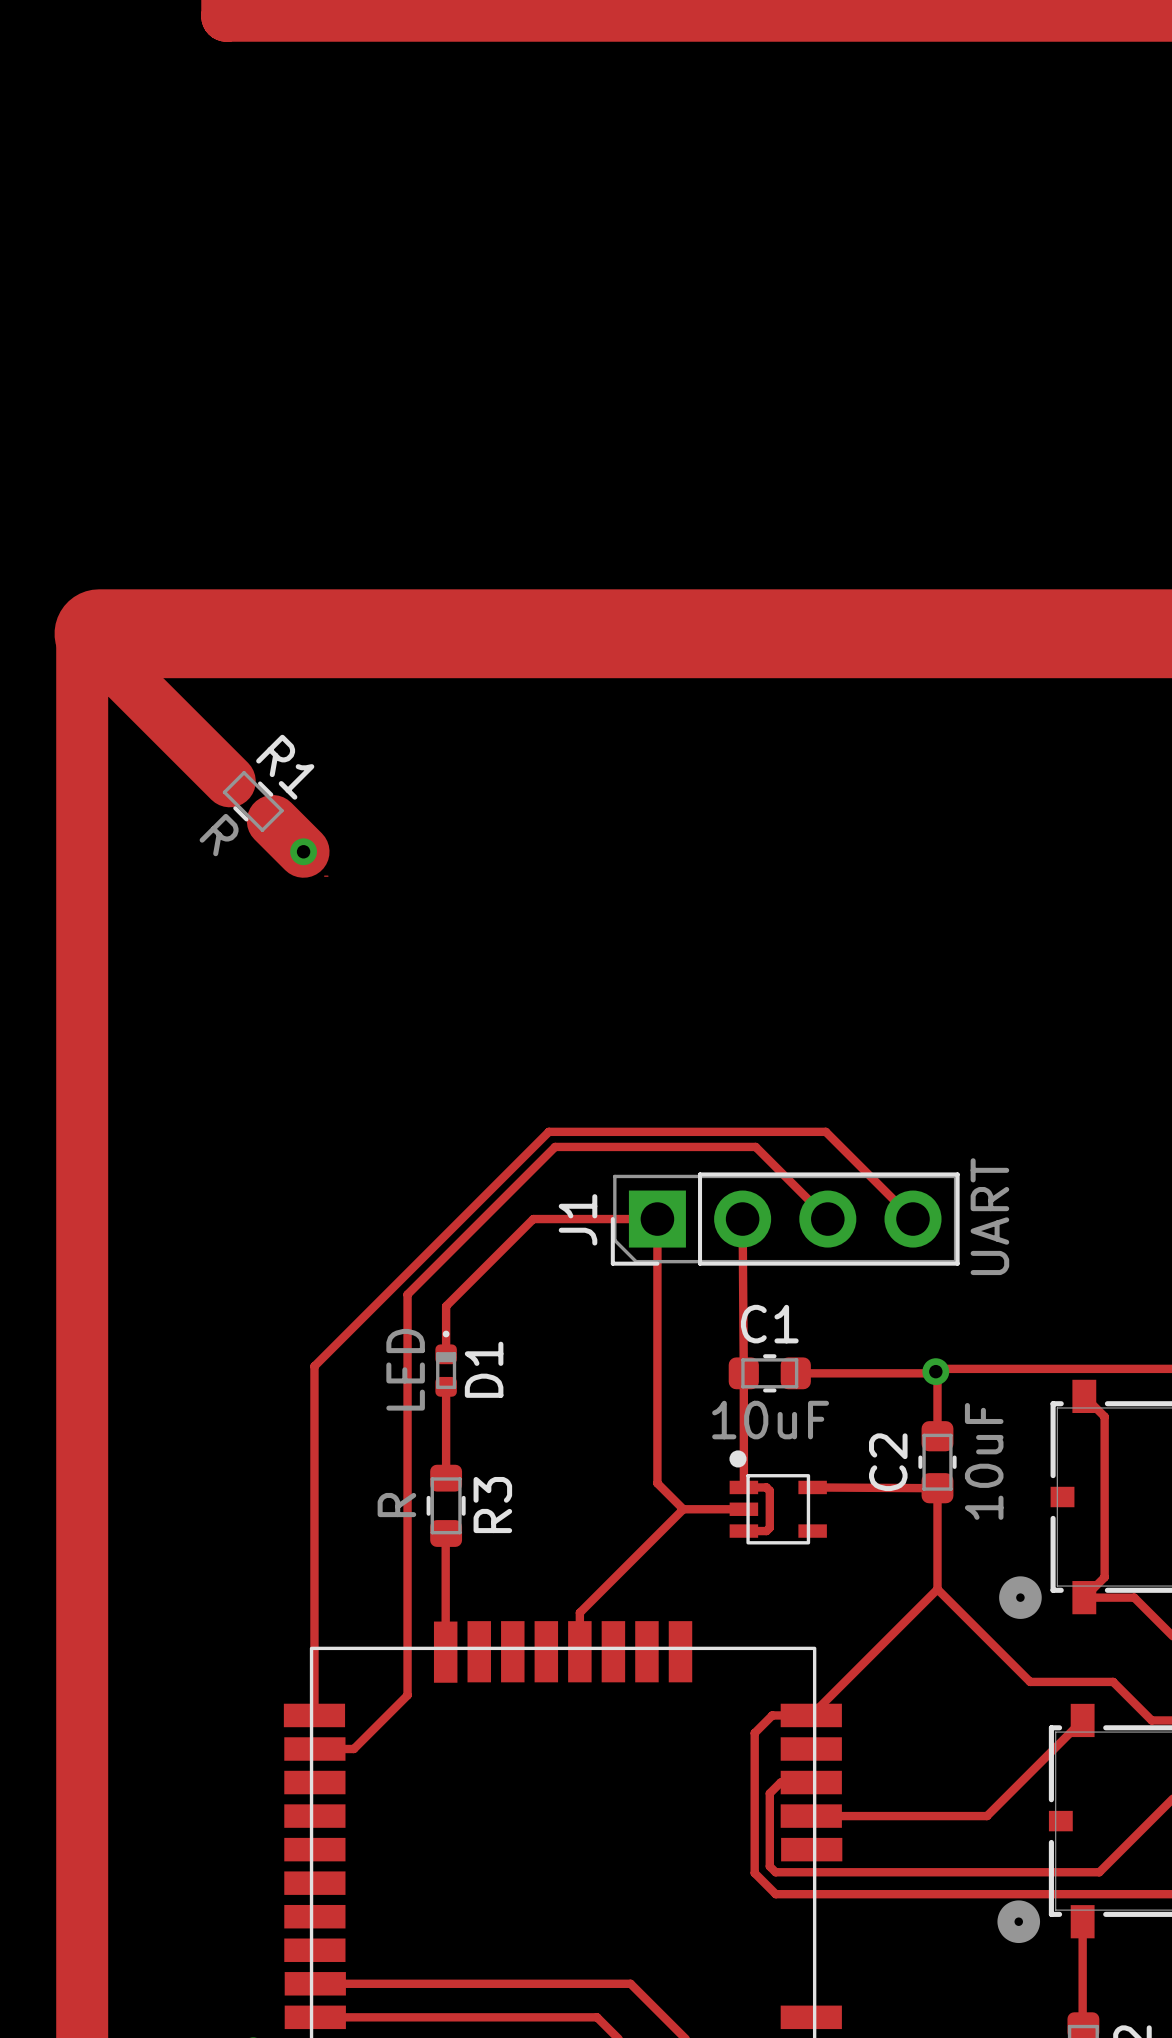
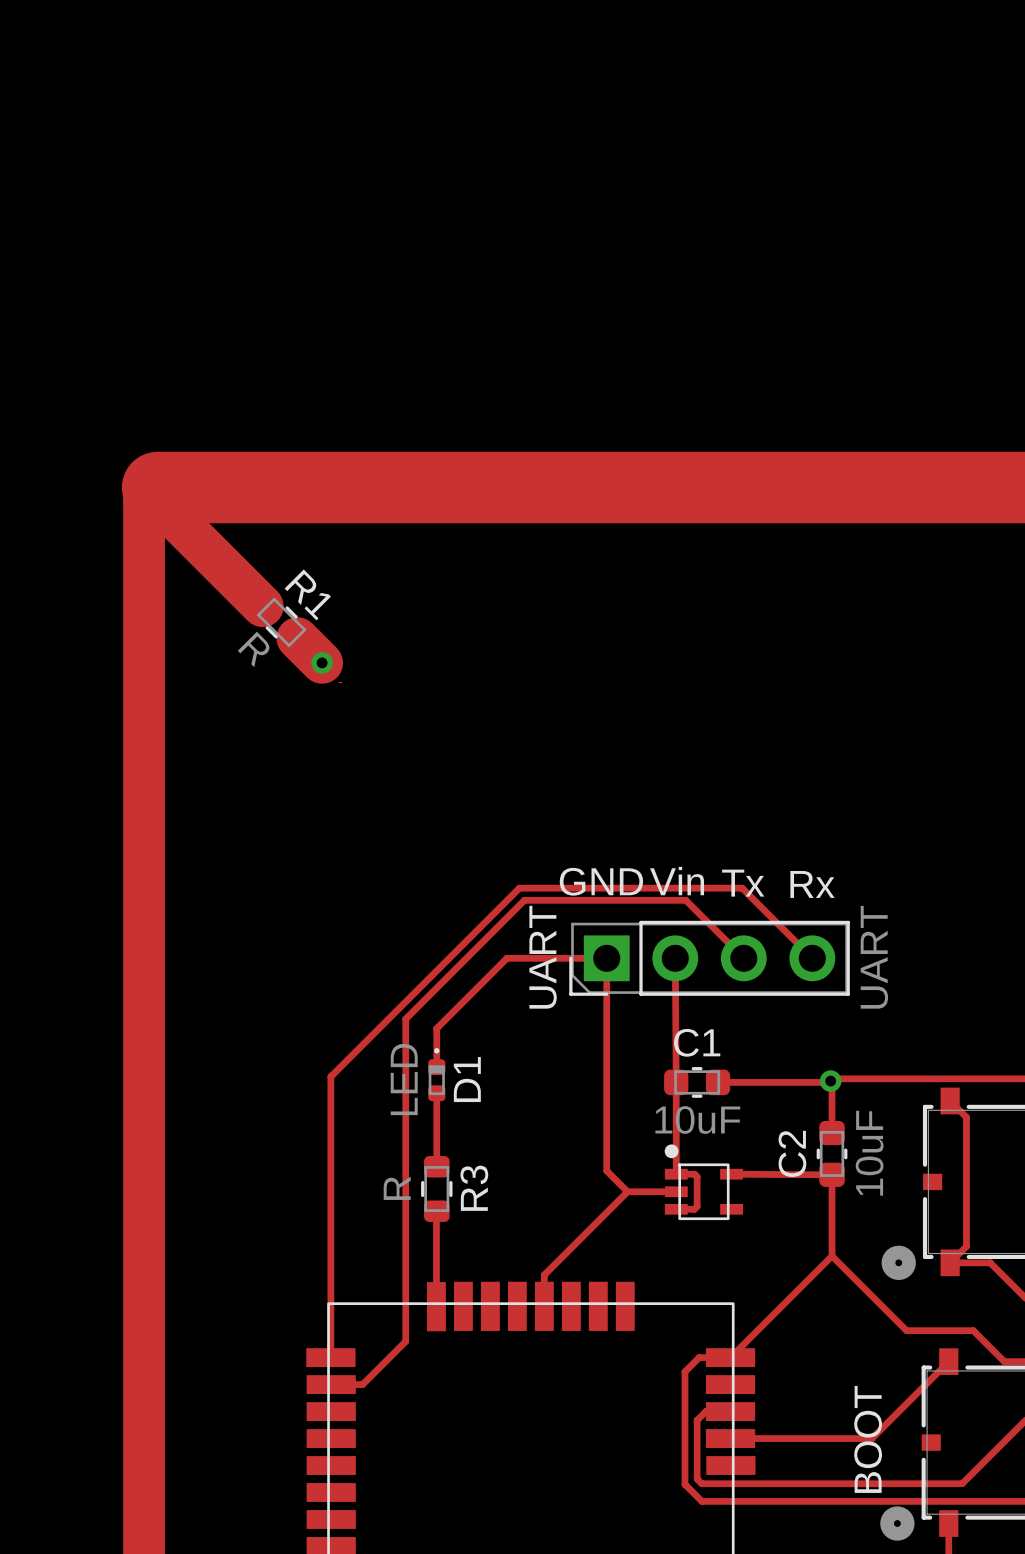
text: none -> GND (601, 881)
text: none -> Vin (677, 881)
text: none -> Tx (743, 883)
text: none -> Rx (812, 884)
J1 name: J1 (578, 1219) -> UART (543, 957)
text: none -> BOOT (868, 1439)

